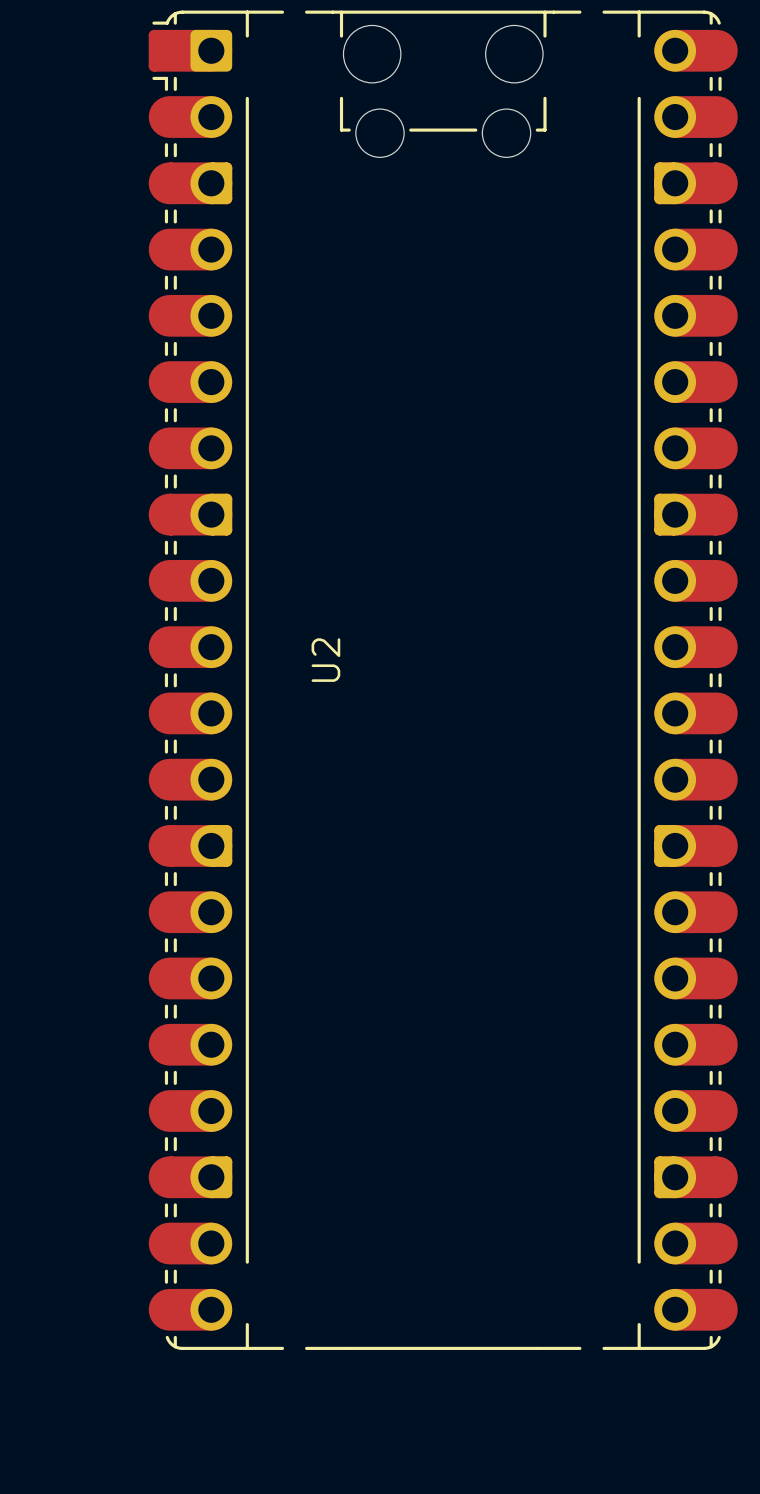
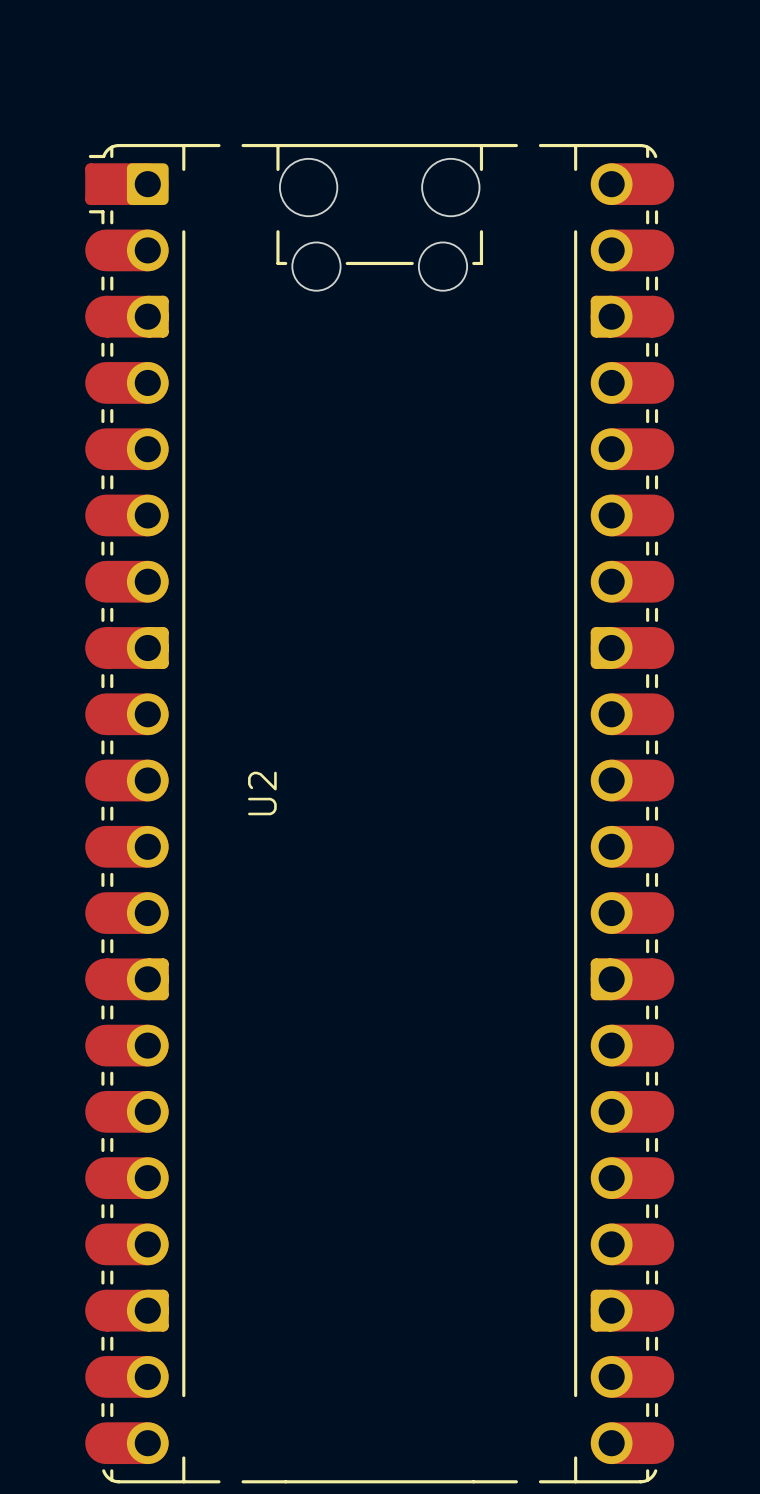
U2 footprint: [148, 10, 738, 1350] -> [85, 143, 675, 1484]

